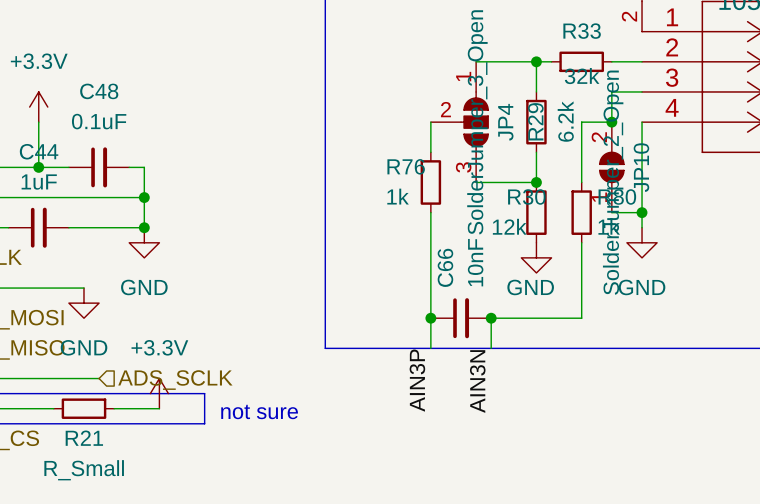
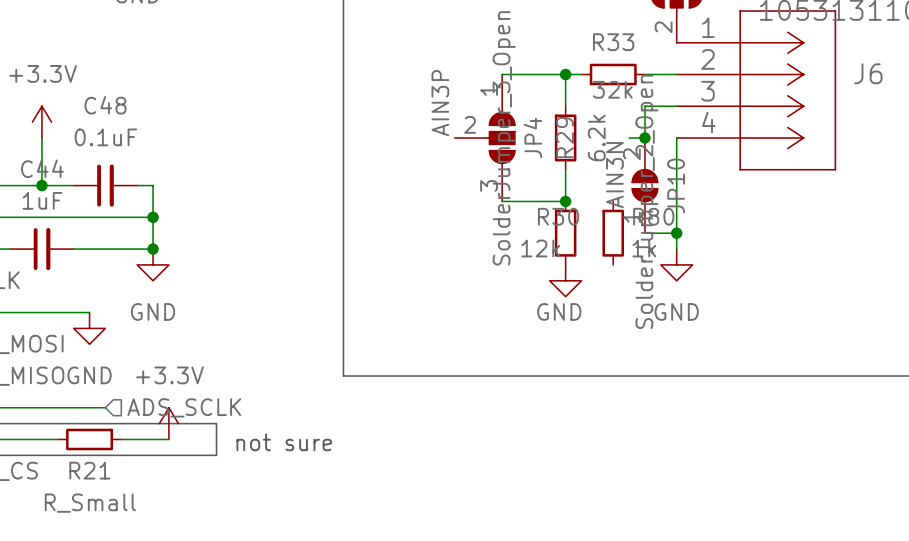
wire: (430, 122) (430, 152) -> none
wire: (596, 122) (581, 122) (581, 182) -> none
R76: 1k (430, 182) -> none
wire: (430, 212) (430, 348) -> none
wire: (581, 242) (581, 318) (491, 318) (491, 348) -> none
junction: (430, 318) -> none
C66: 10nF (461, 318) -> none
junction: (491, 318) -> none
label position: AIN3P (417, 380) -> AIN3P (440, 103)
label position: AIN3N (477, 381) -> AIN3N (614, 175)

